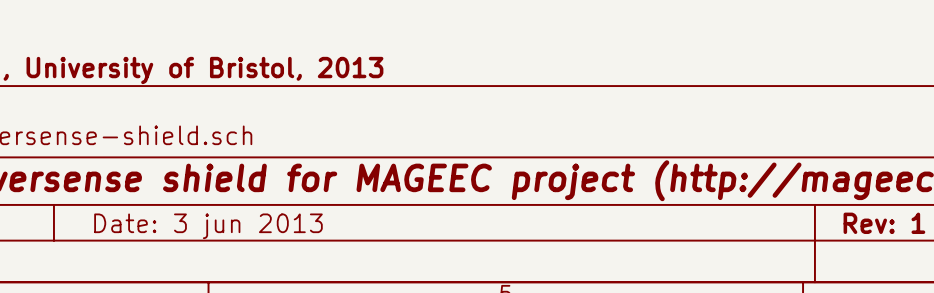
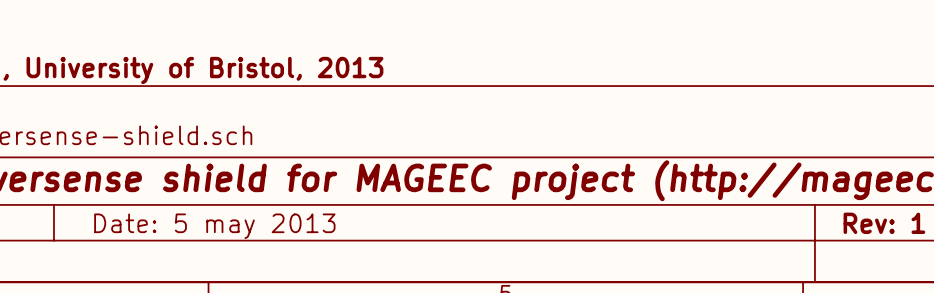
title block: Date: 3 jun 2013 (208, 226) -> Date: 5 may 2013 (214, 226)

